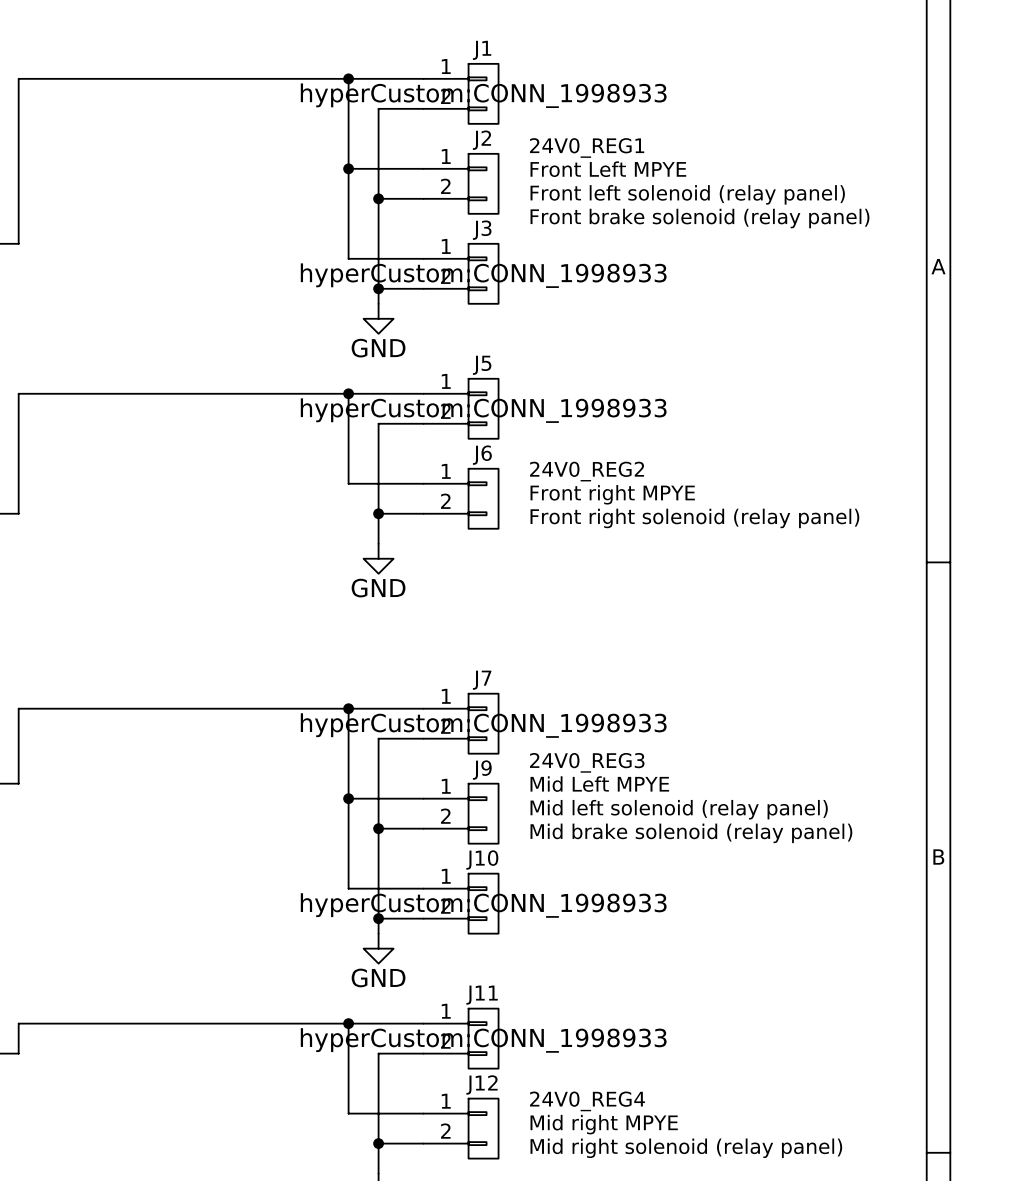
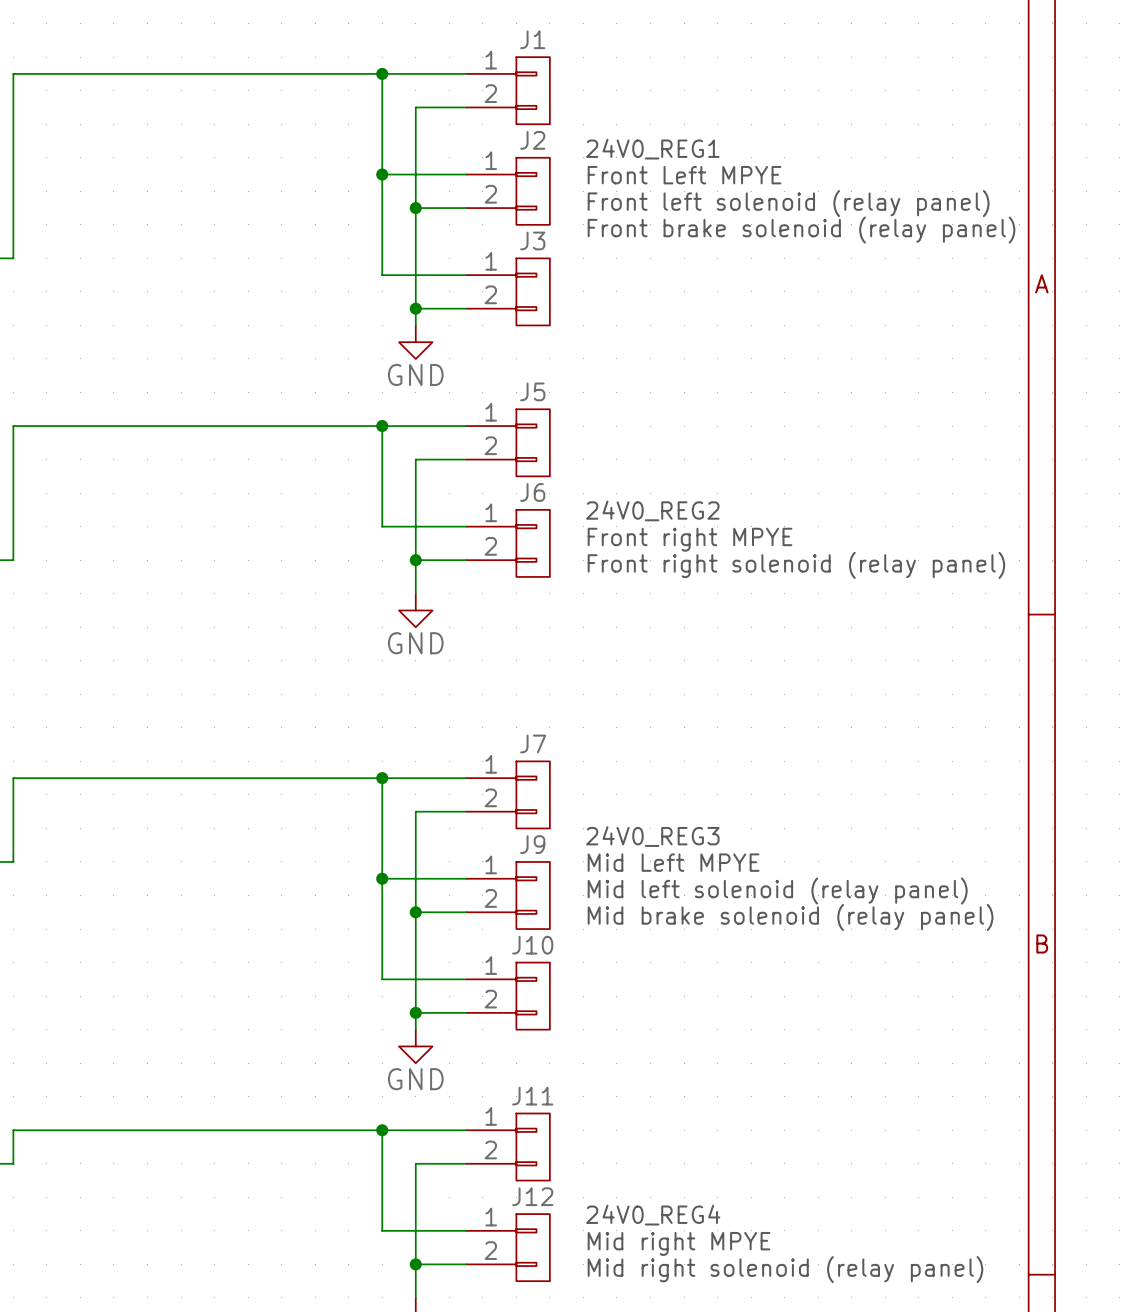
J1 text: hyperCustom:CONN_1998933 (483, 95) -> none
J3 text: hyperCustom:CONN_1998933 (483, 275) -> none
J5 text: hyperCustom:CONN_1998933 (483, 410) -> none
J7 text: hyperCustom:CONN_1998933 (483, 725) -> none
J10 text: hyperCustom:CONN_1998933 (483, 905) -> none
J11 text: hyperCustom:CONN_1998933 (483, 1040) -> none

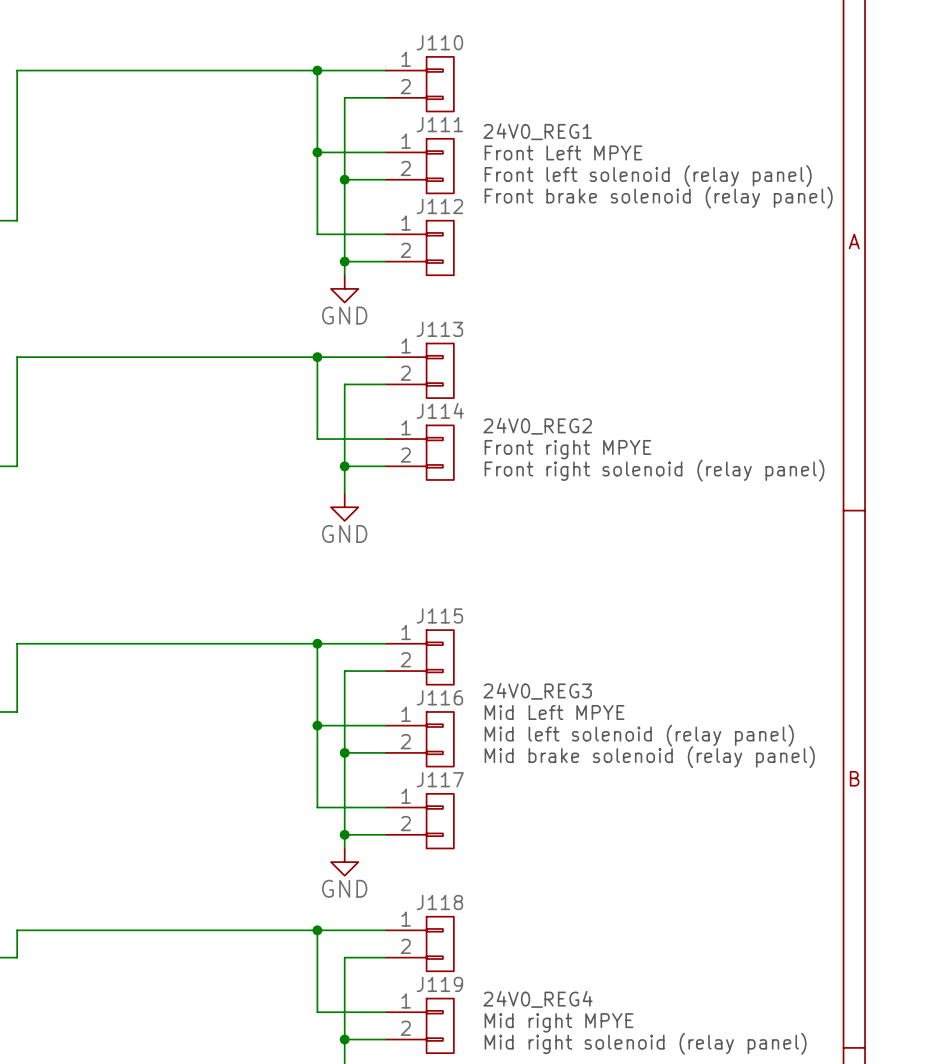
J1 name: J1 (532, 39) -> J110 (439, 42)
J2 name: J2 (532, 140) -> J111 (439, 124)
J3 name: J3 (532, 240) -> J112 (439, 206)
J5 name: J5 (532, 391) -> J113 (439, 329)
J6 name: J6 (532, 492) -> J114 (440, 410)
J7 name: J7 (533, 743) -> J115 (439, 615)
J9 name: J9 (532, 844) -> J116 (439, 697)
J10 name: J10 (532, 945) -> J117 (440, 779)
J11 name: J11 (532, 1096) -> J118 (439, 902)
J12 name: J12 (532, 1196) -> J119 (439, 984)

